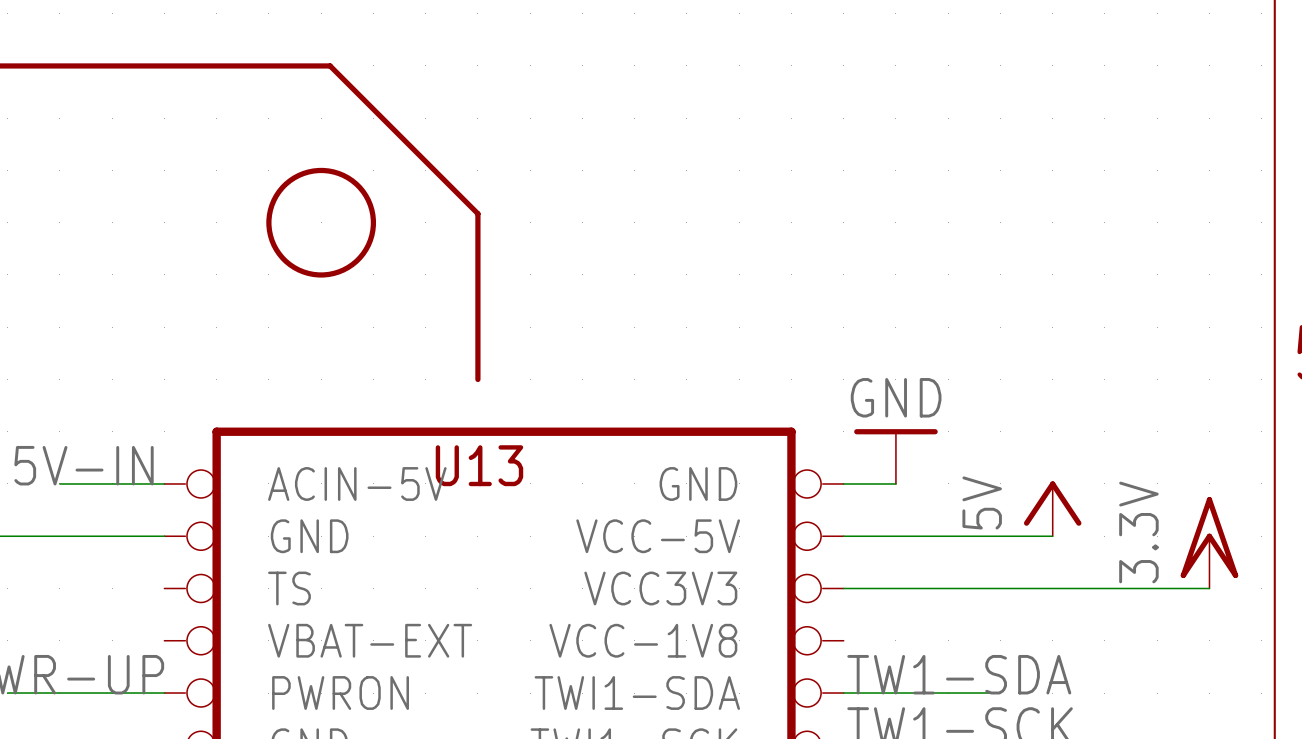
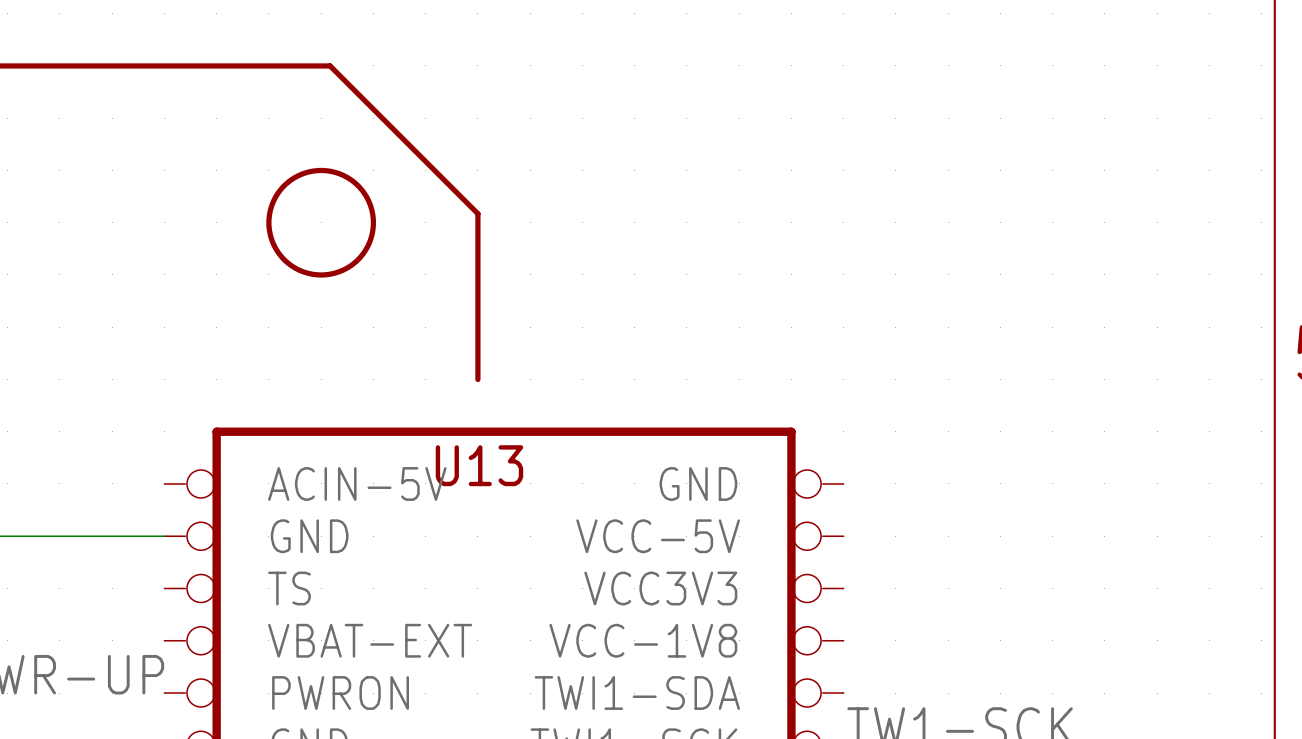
power symbol: GND (895, 456) -> none
label: 5V-IN (84, 465) -> none
wire: (59, 483) (164, 483) -> none
wire: (843, 483) (895, 483) -> none
power symbol: 5V (1052, 508) -> none
wire: (843, 536) (1052, 536) -> none
power symbol: 3.3V (1209, 542) -> none
wire: (843, 588) (1209, 588) -> none
label: TW1-SDA (959, 674) -> none
wire: (7, 693) (164, 693) -> none
wire: (843, 693) (1000, 693) -> none

